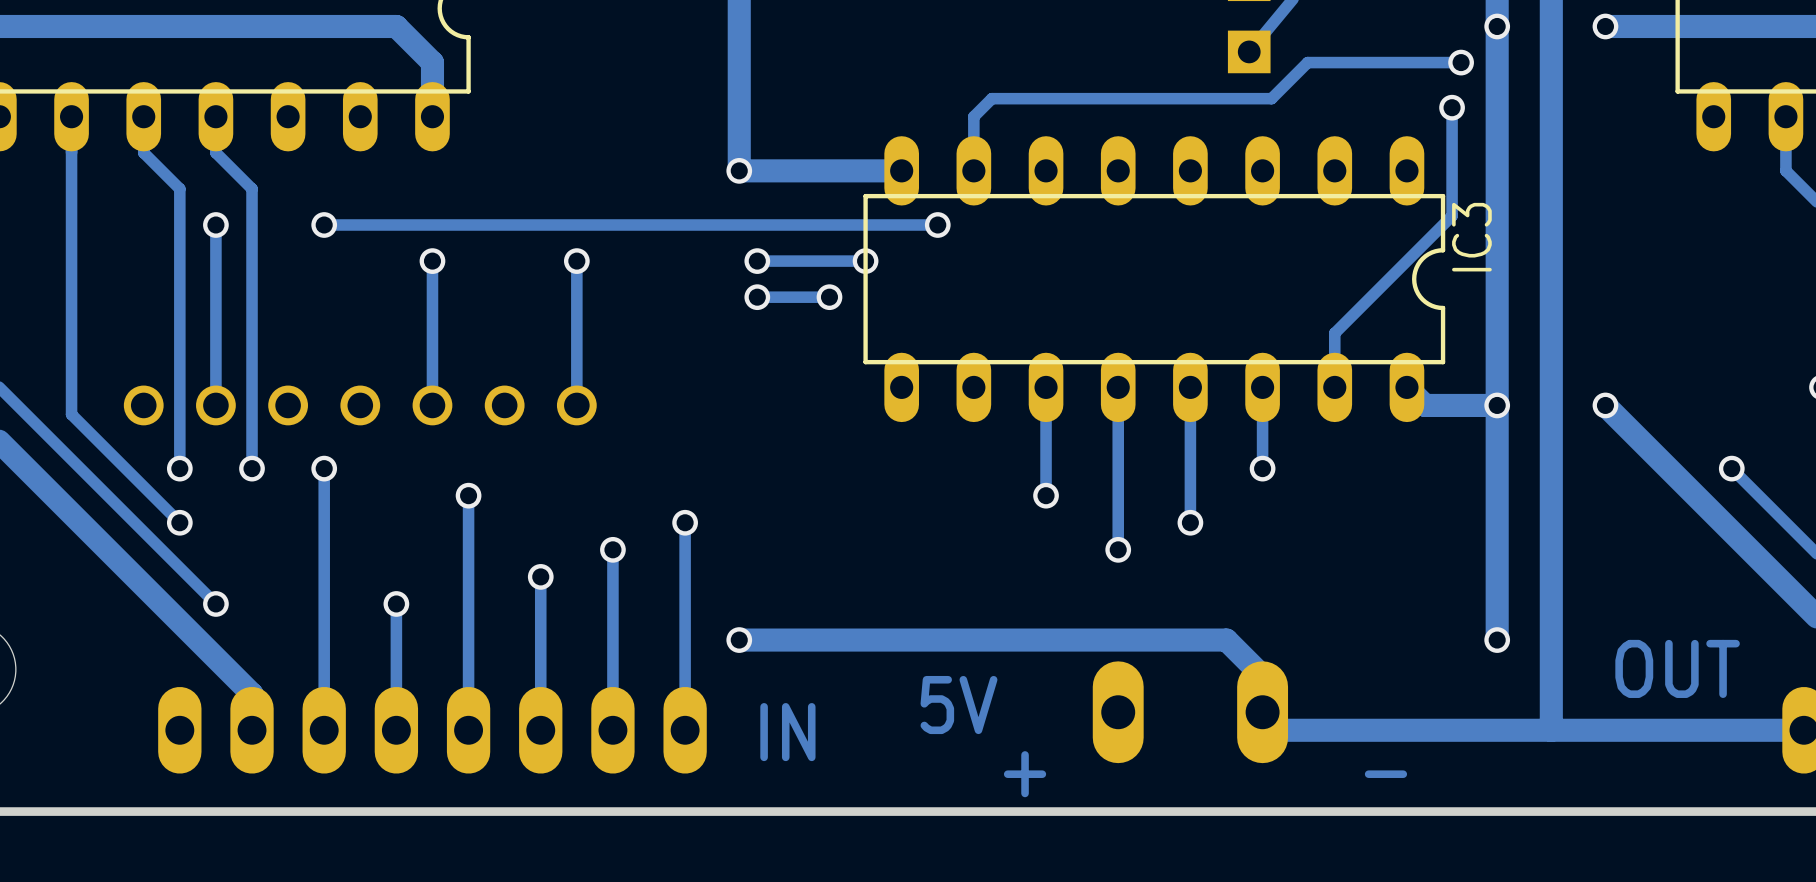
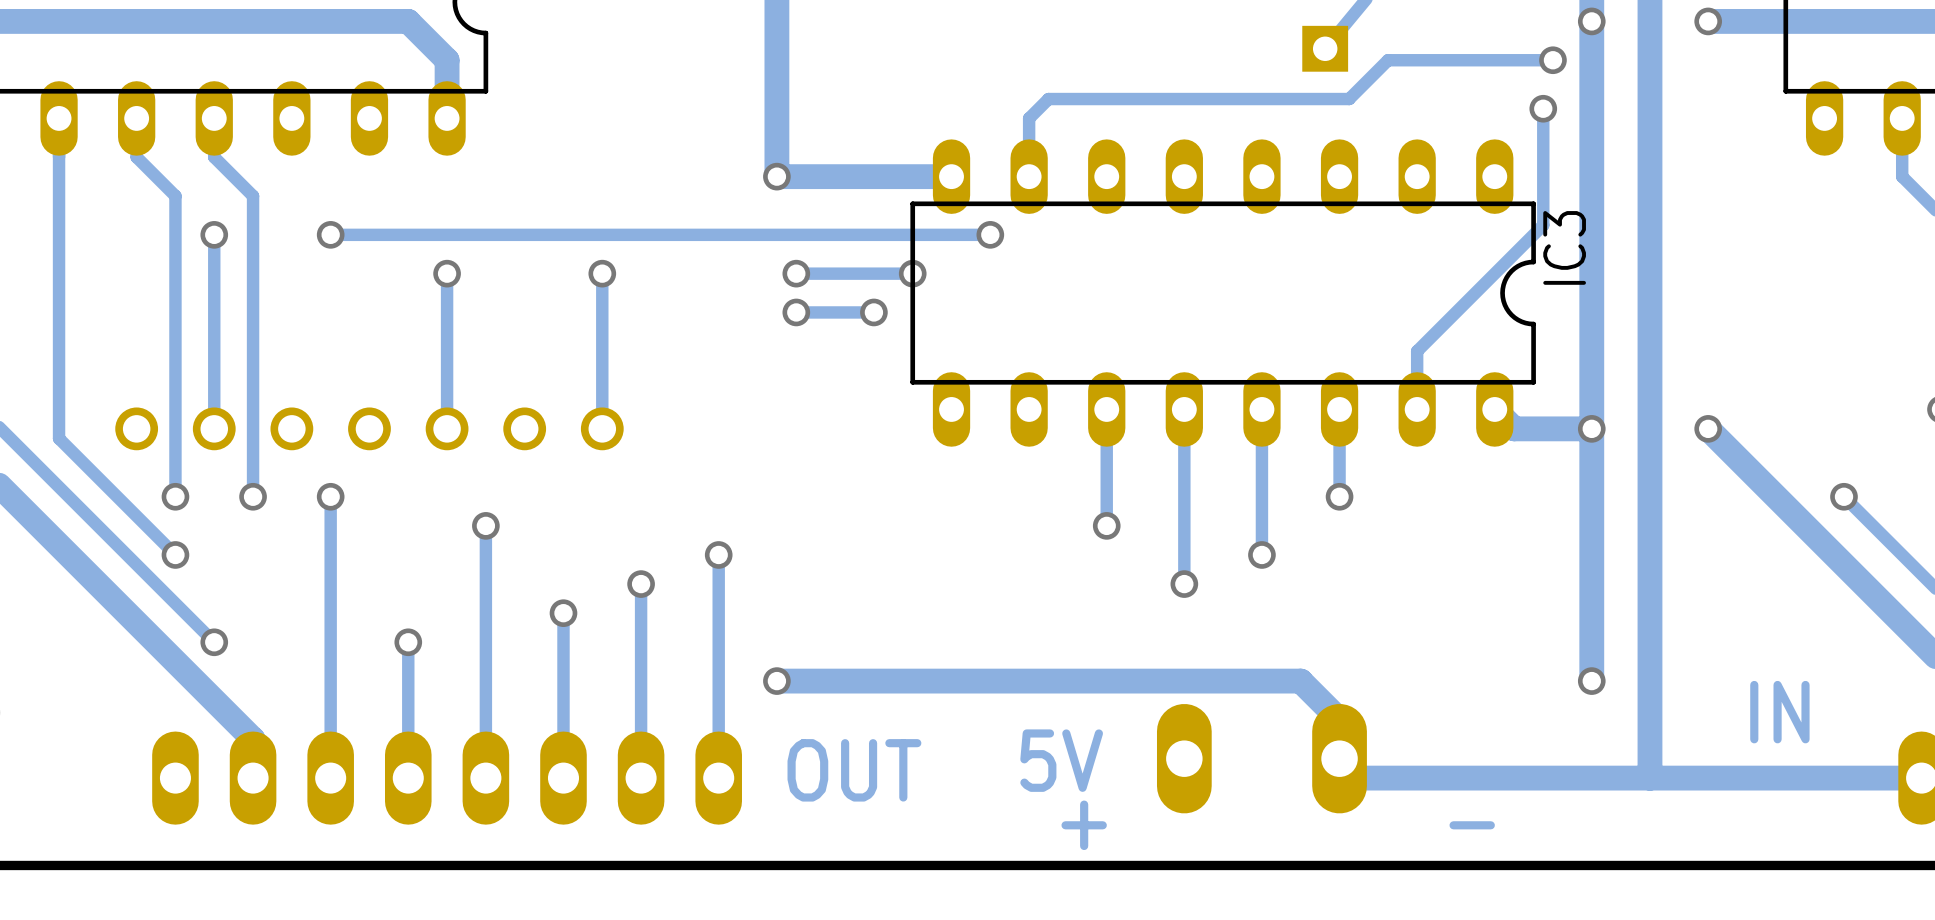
text: OUT (1677, 668) -> IN (1779, 712)
text position: 5V (958, 705) -> 5V (1061, 760)
text: IN (787, 732) -> OUT (854, 770)

